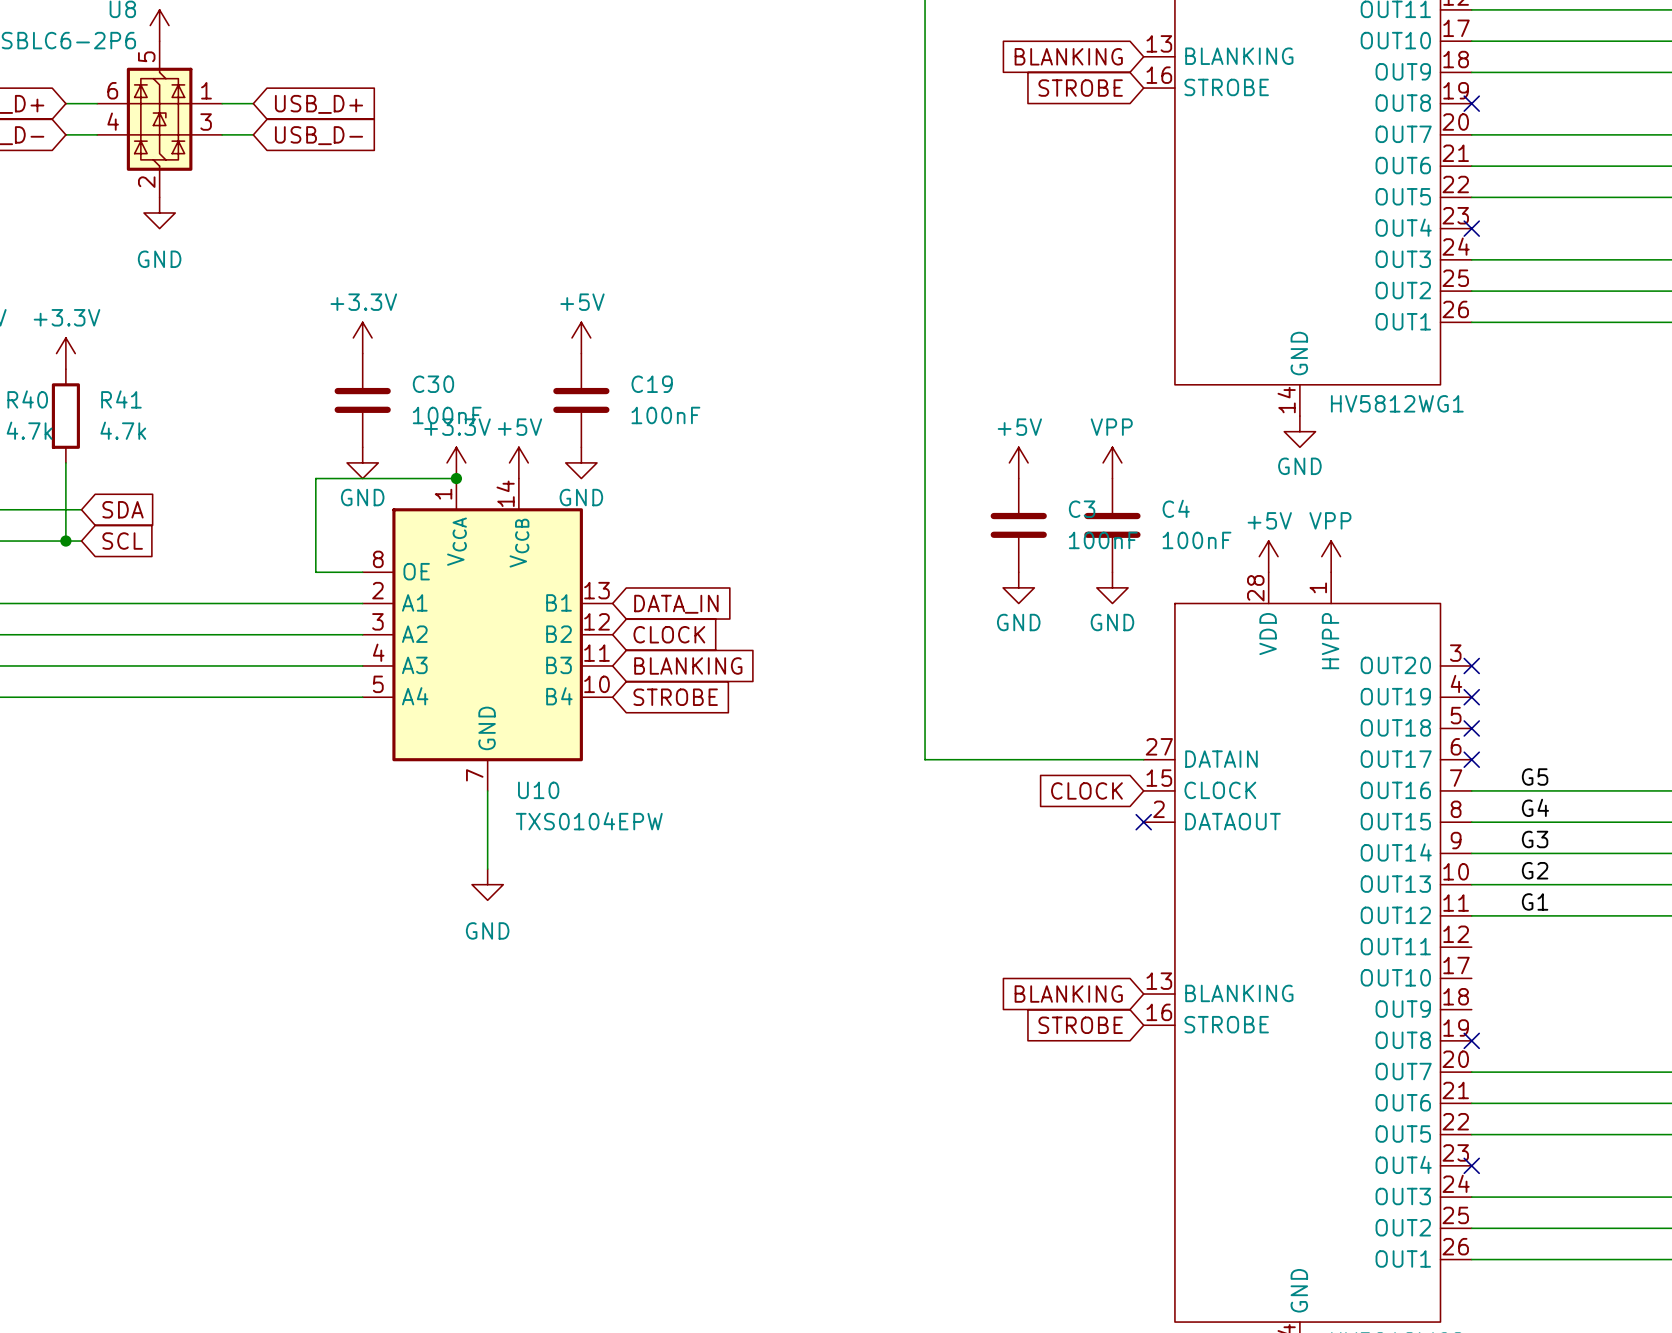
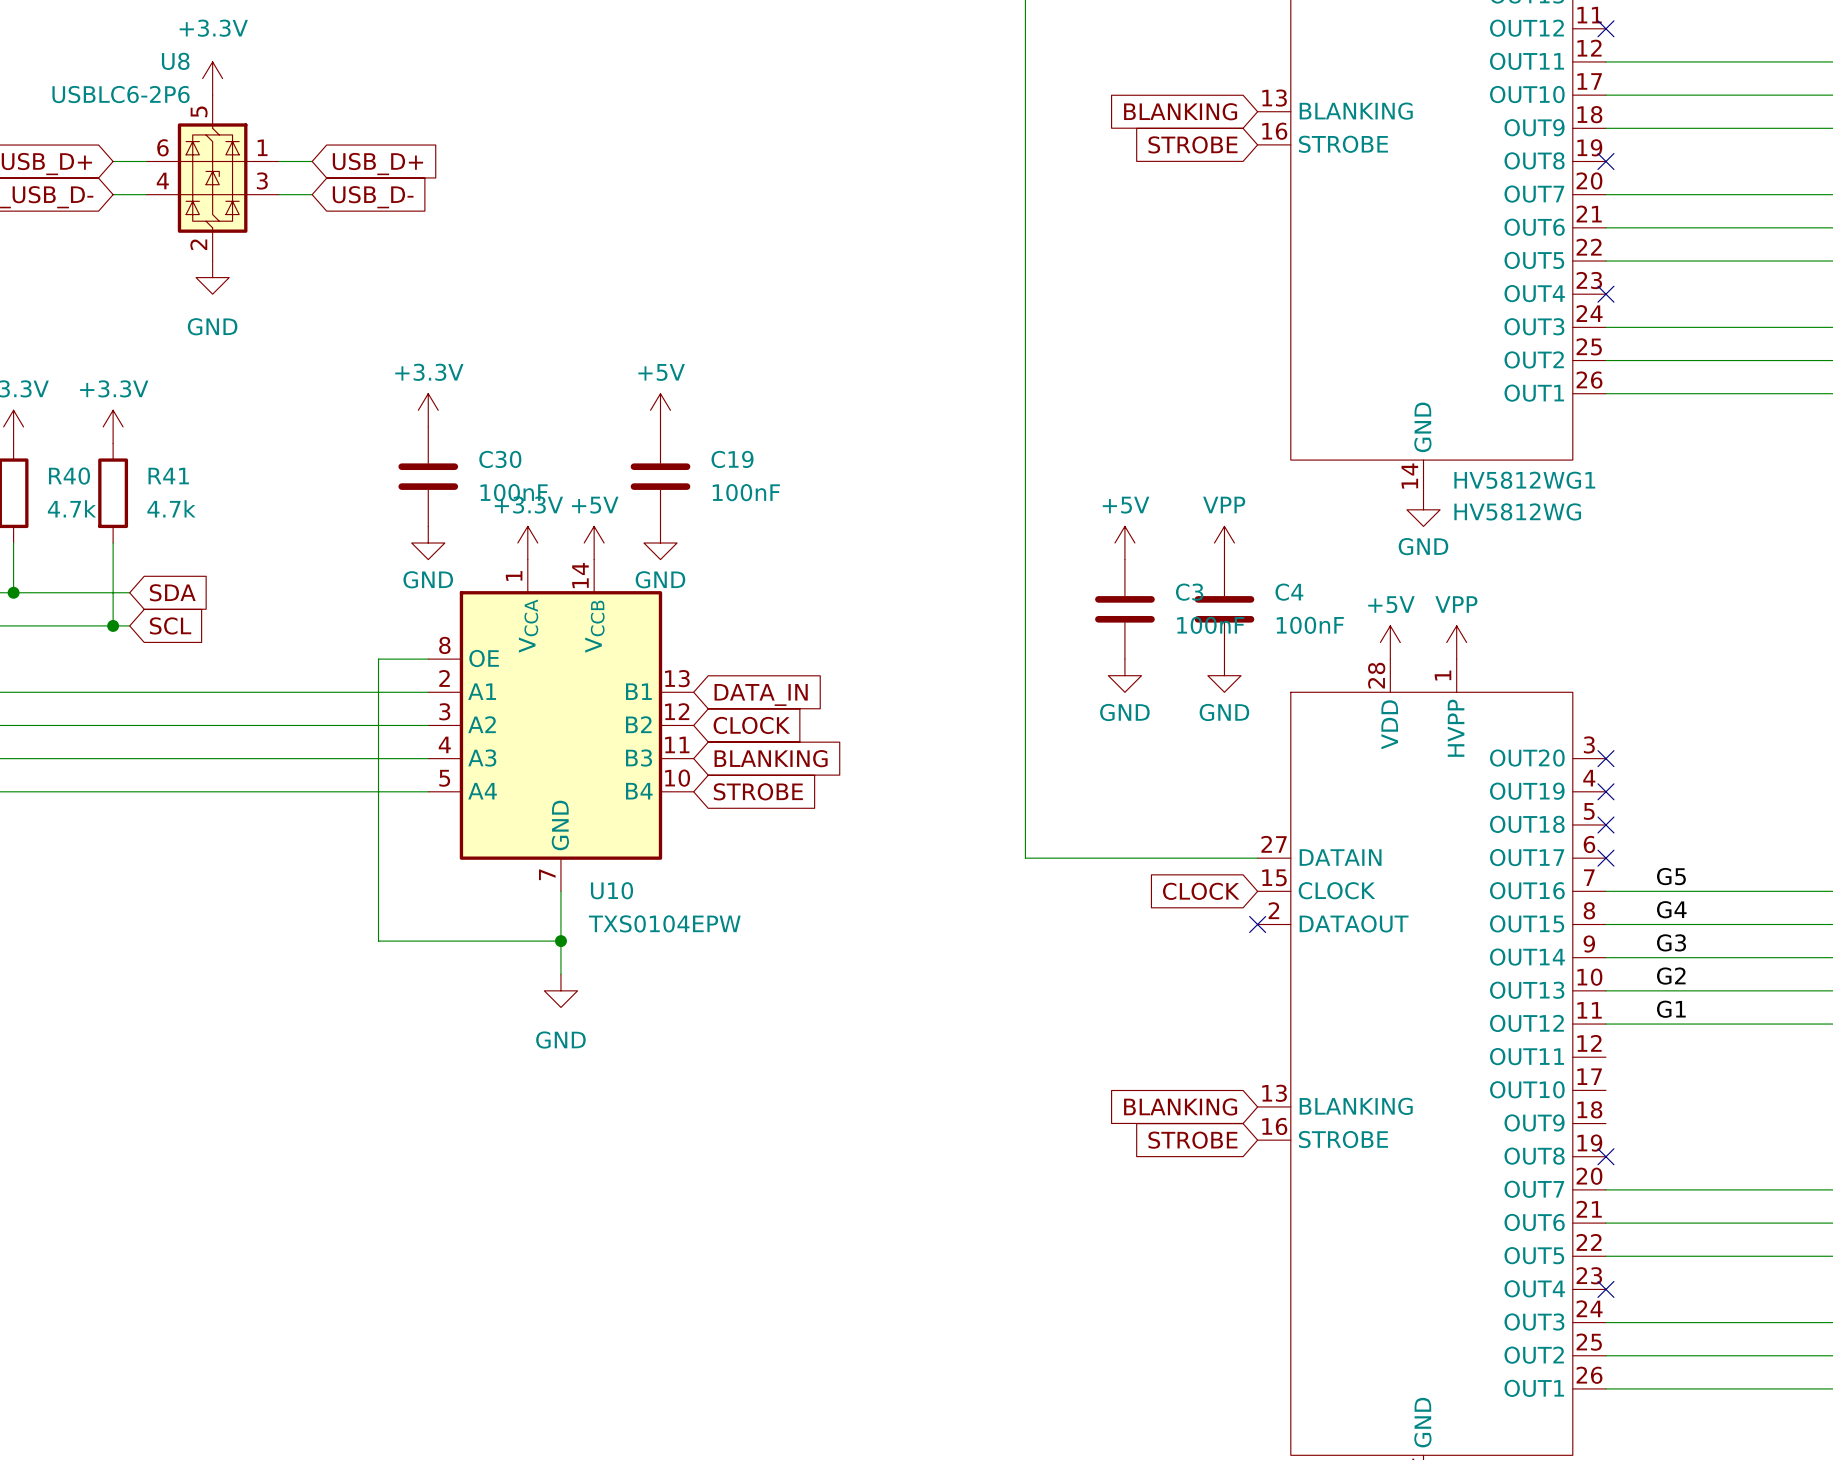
HV5812WG1 value: none -> HV5812WG (1517, 511)
wire: (456, 478) (315, 478) (315, 572) -> (560, 941) (378, 941) (378, 659)
junction: (456, 478) -> none
junction: none -> (560, 941)

